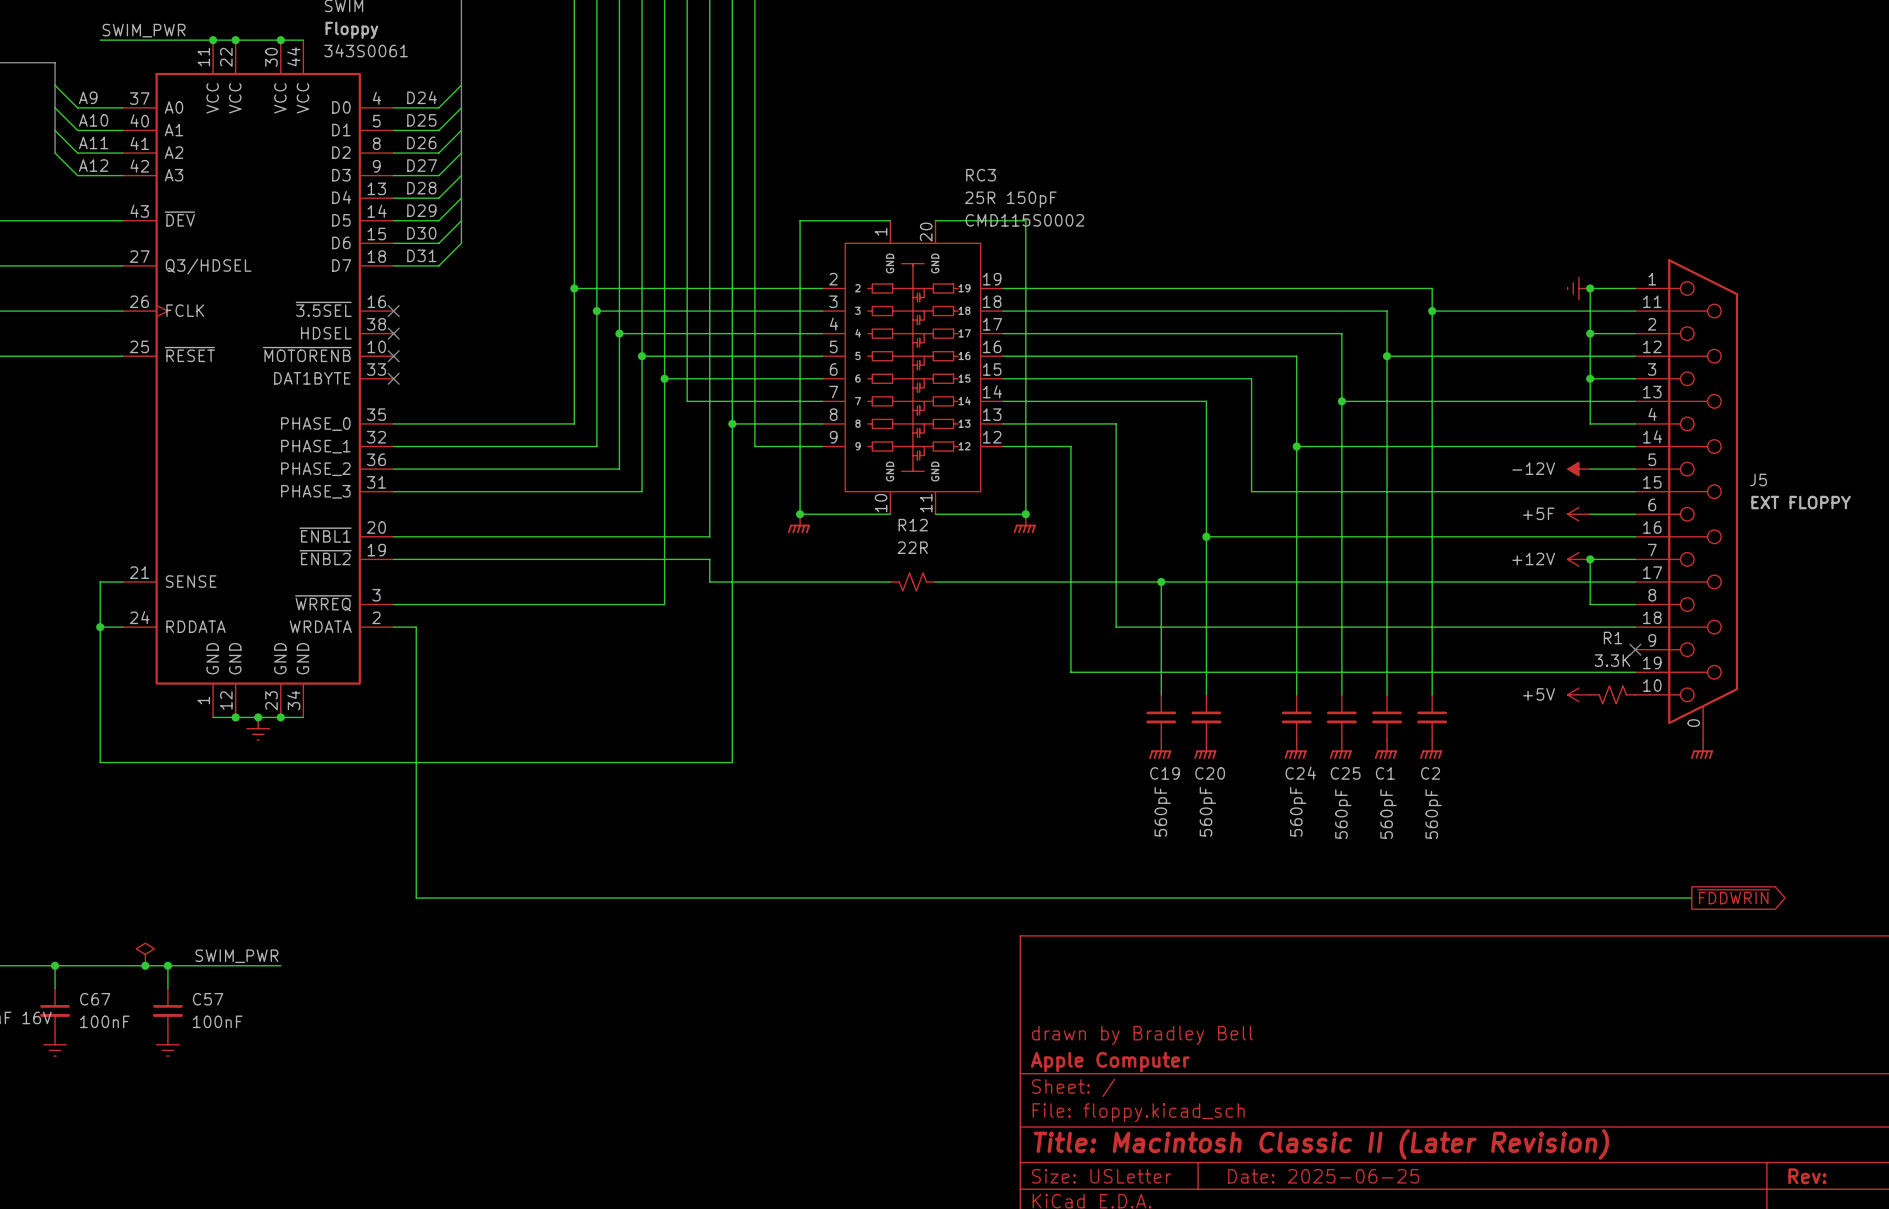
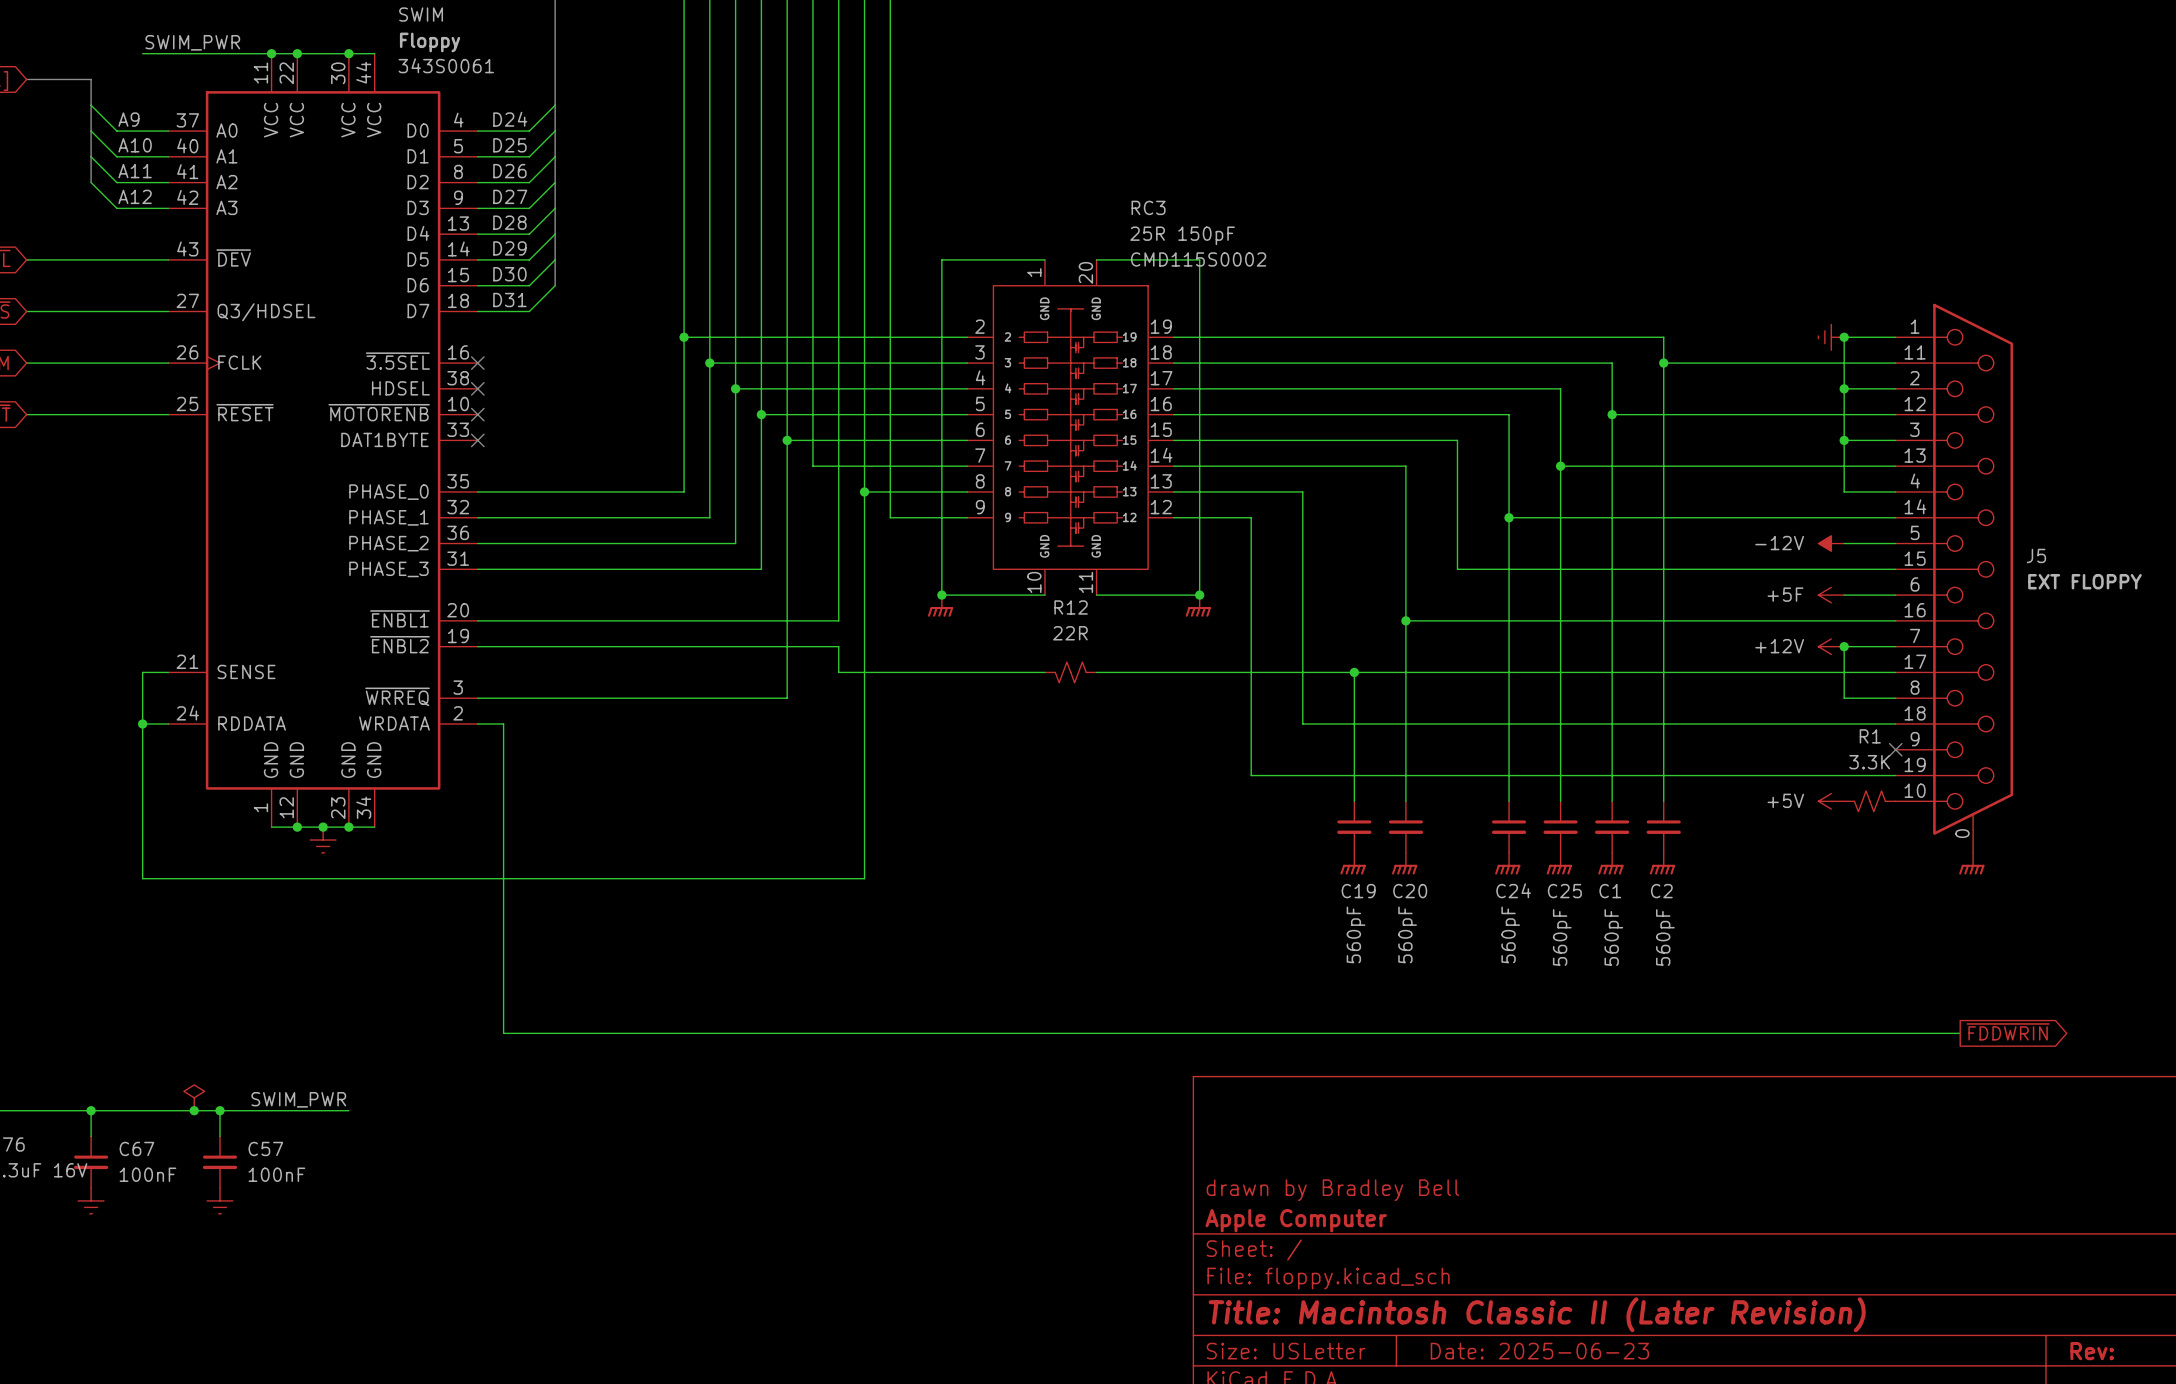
title block: Date: 2025-06-25 (1323, 1176) -> Date: 2025-06-23 (1539, 1351)

